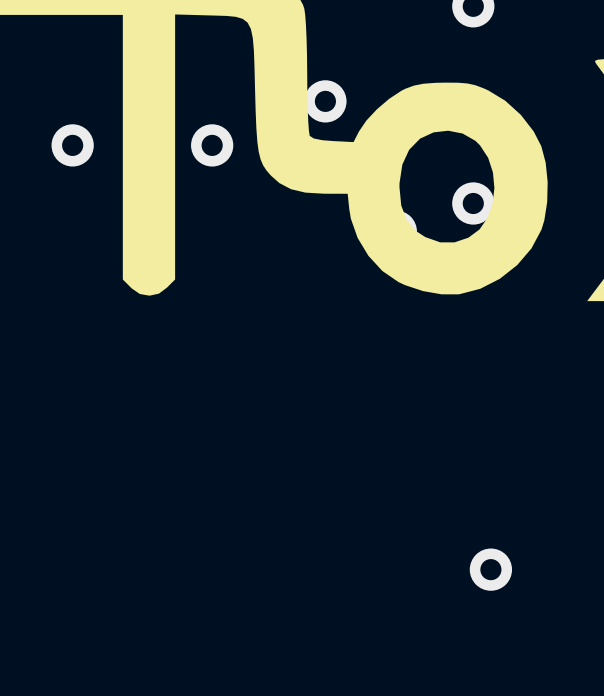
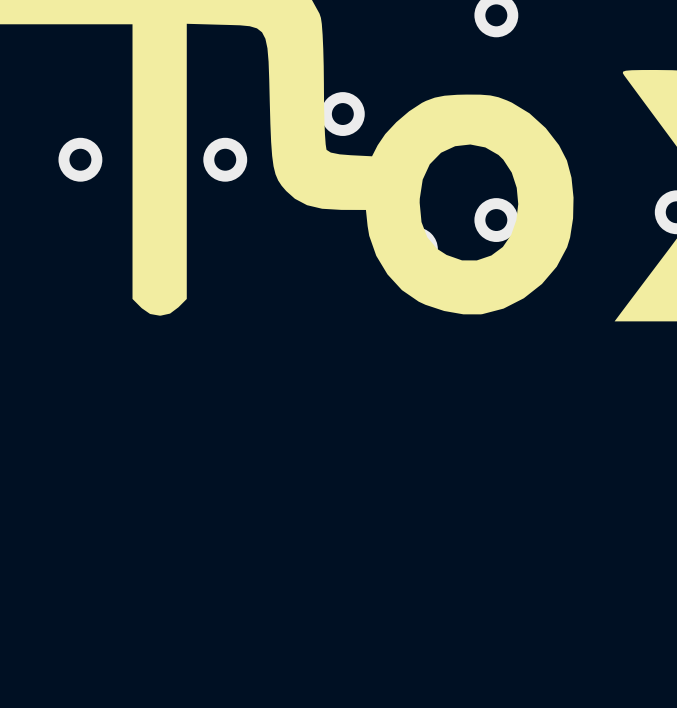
via: (490, 569) -> none

